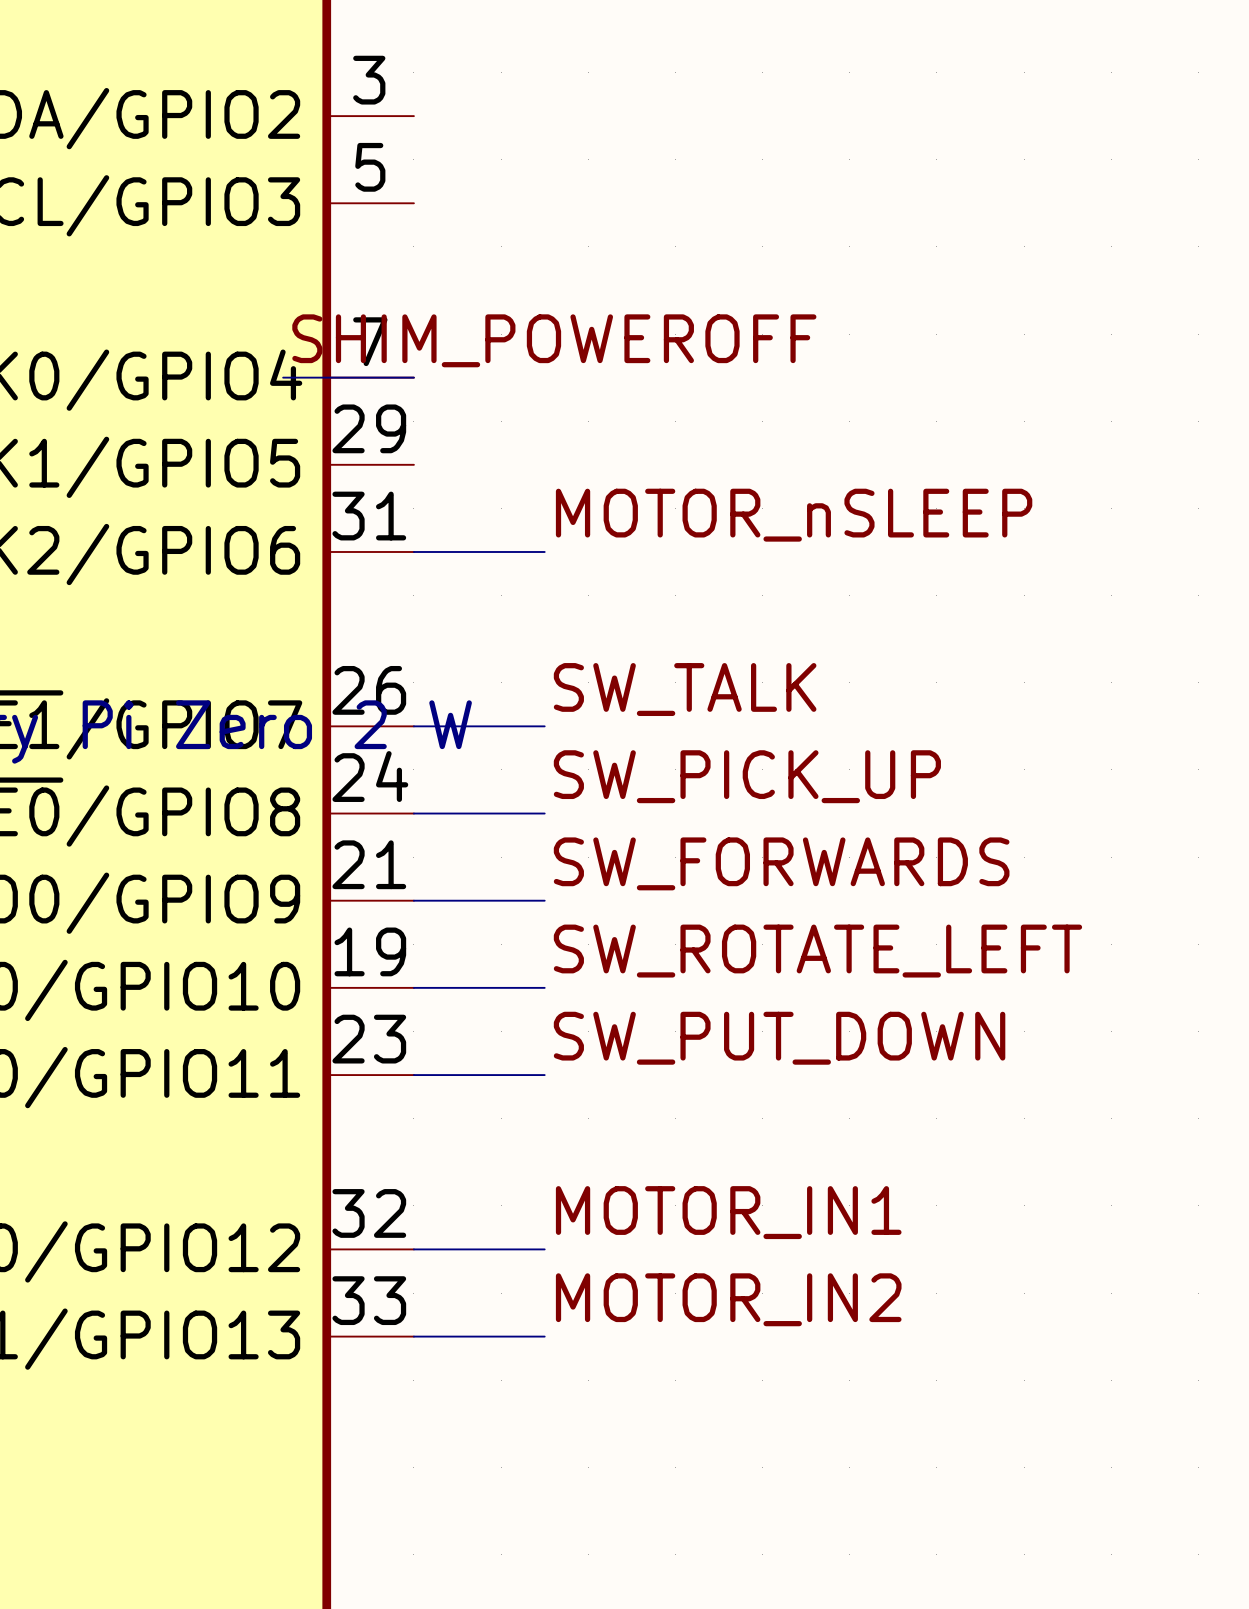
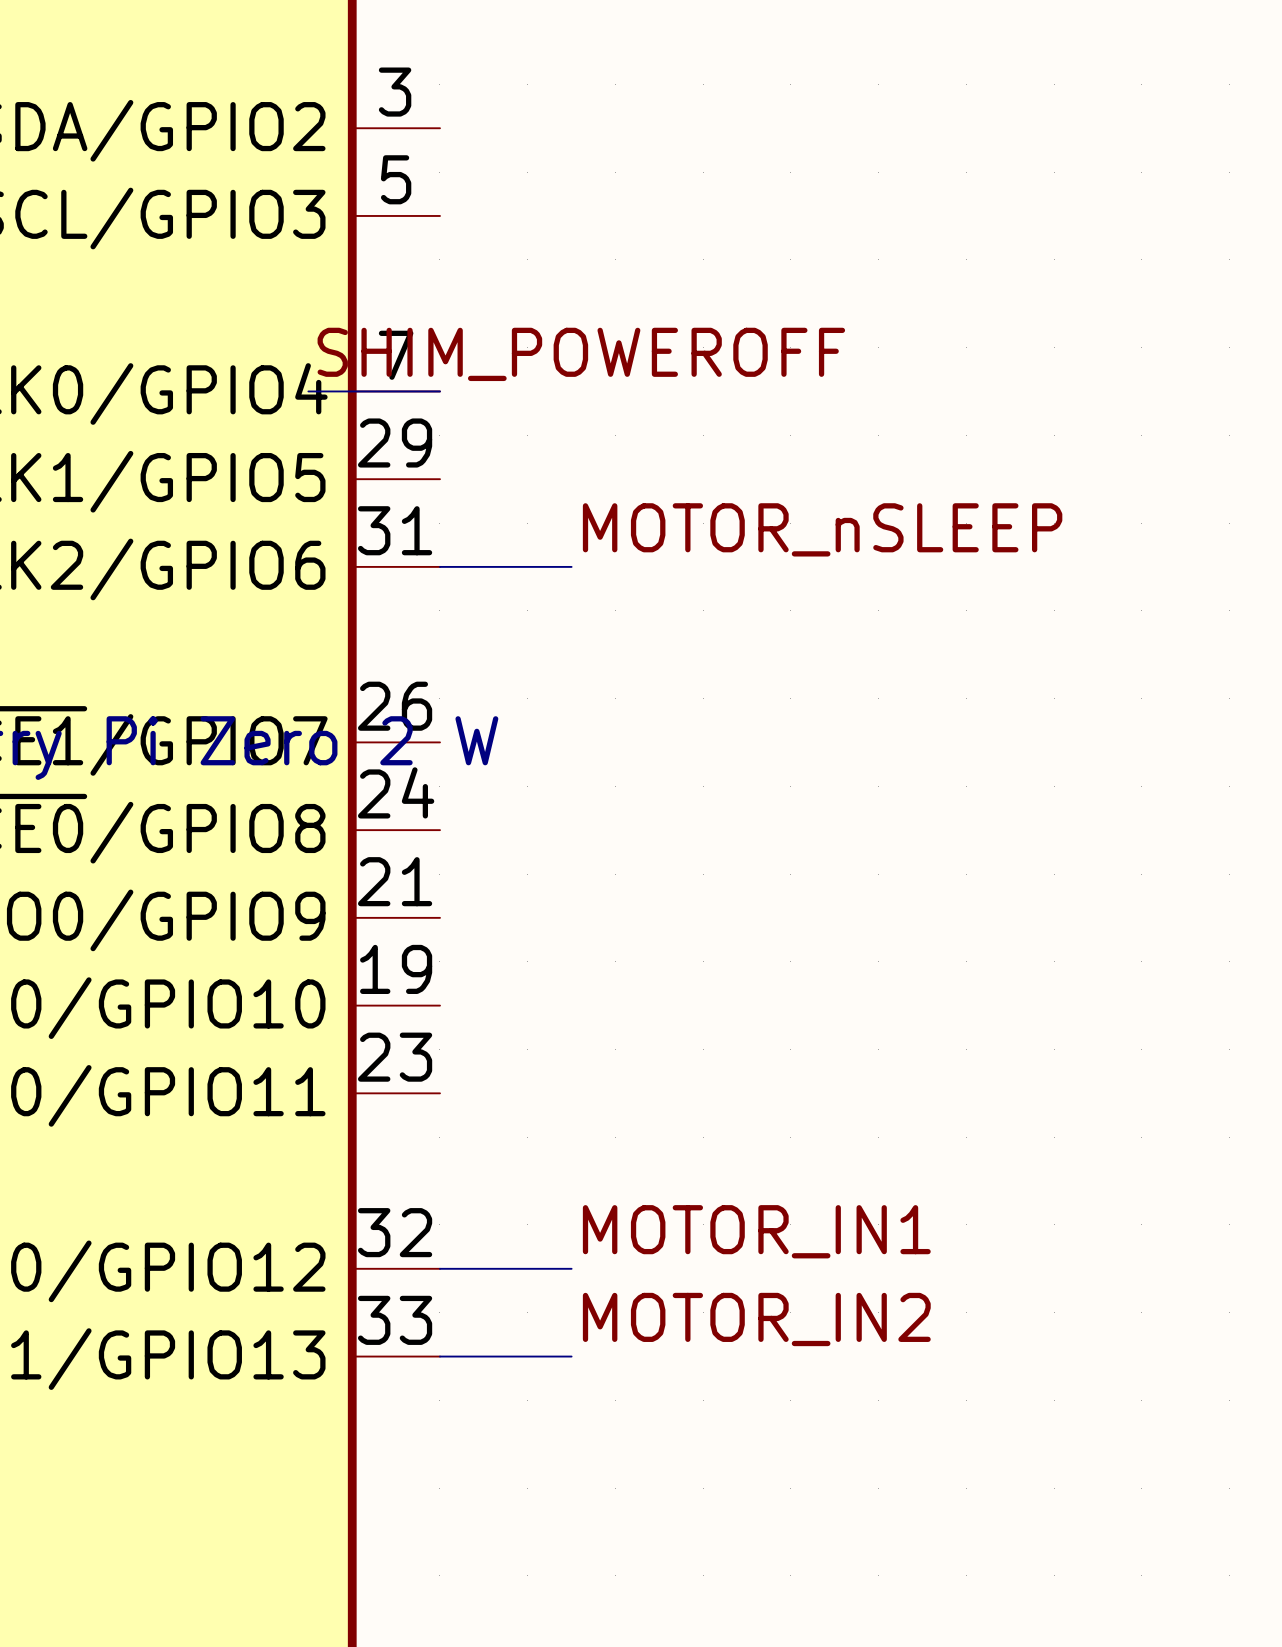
label: SW_TALK (685, 689) -> none
wire: (413, 726) (544, 726) -> none
label: SW_PICK_UP (747, 776) -> none
wire: (413, 813) (544, 813) -> none
label: SW_FORWARDS (781, 863) -> none
wire: (413, 900) (544, 900) -> none
label: SW_ROTATE_LEFT (817, 951) -> none
wire: (413, 987) (544, 987) -> none
label: SW_PUT_DOWN (779, 1038) -> none
wire: (413, 1075) (544, 1075) -> none

